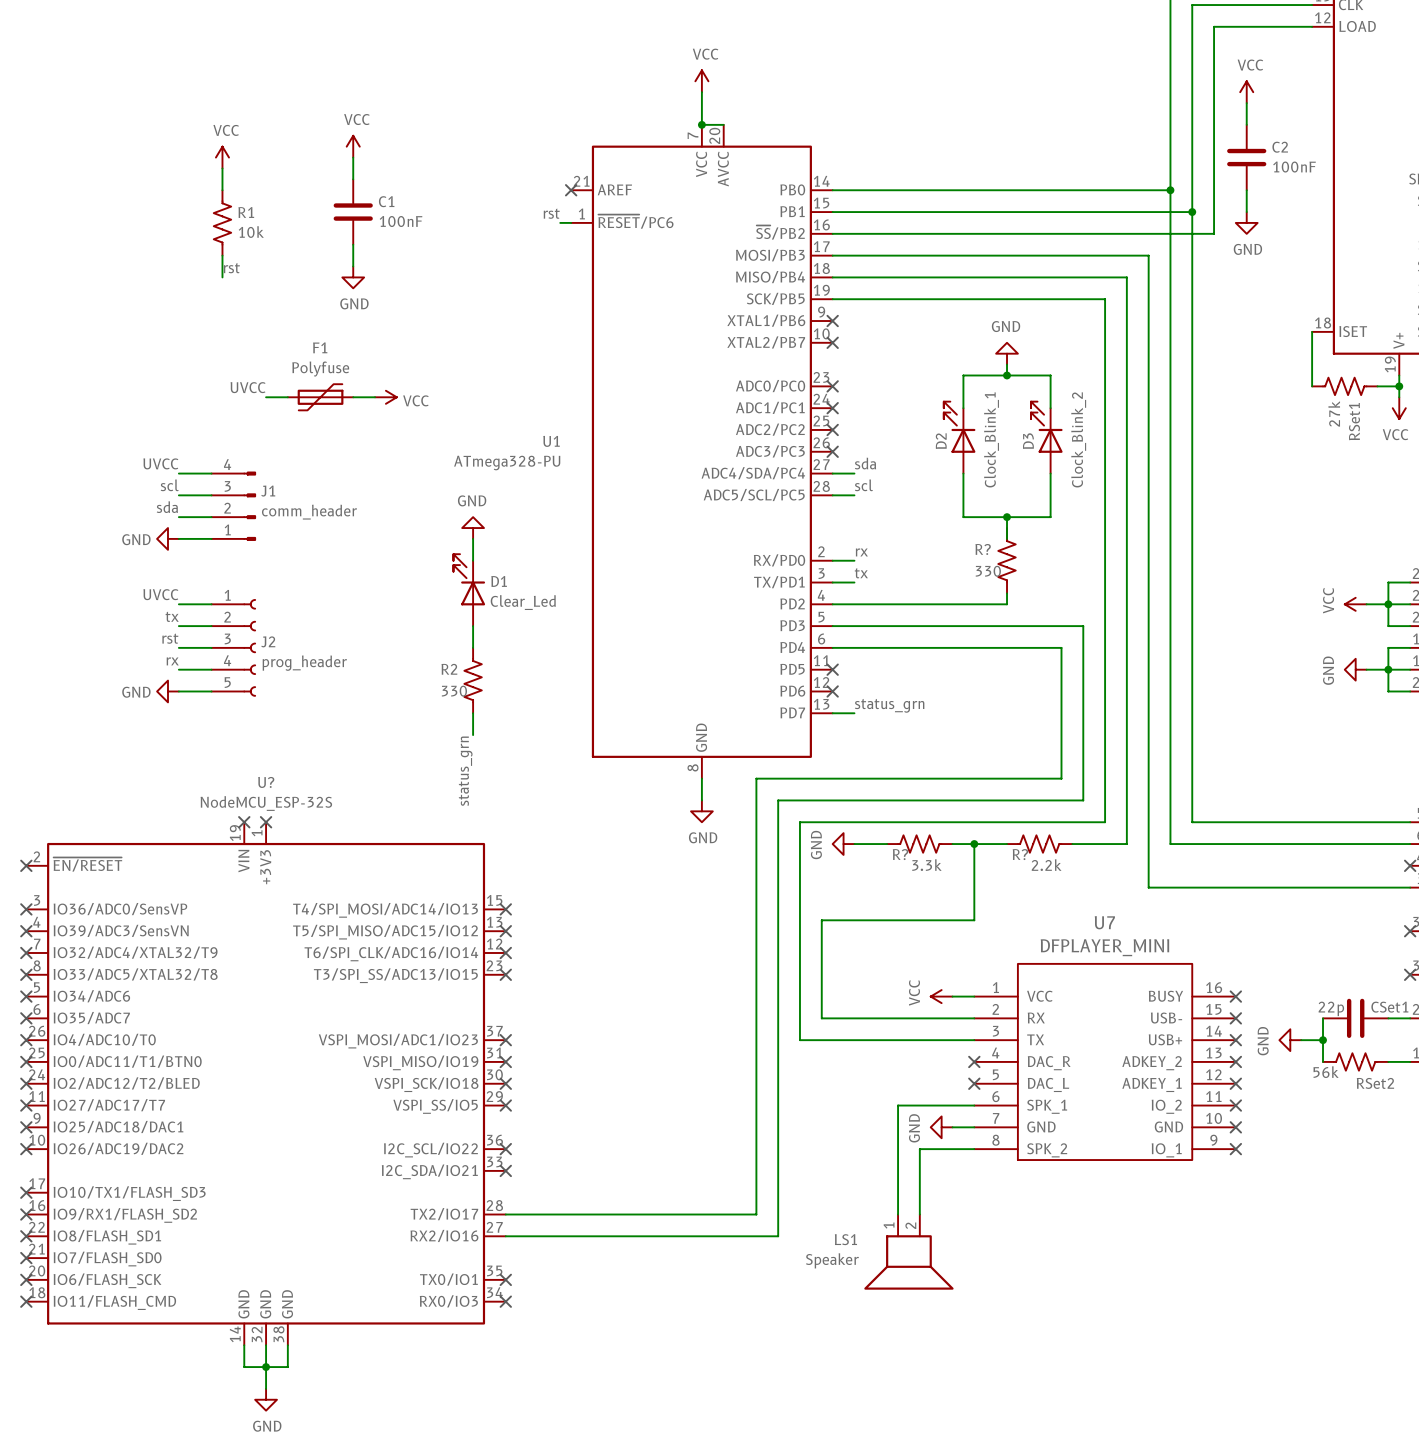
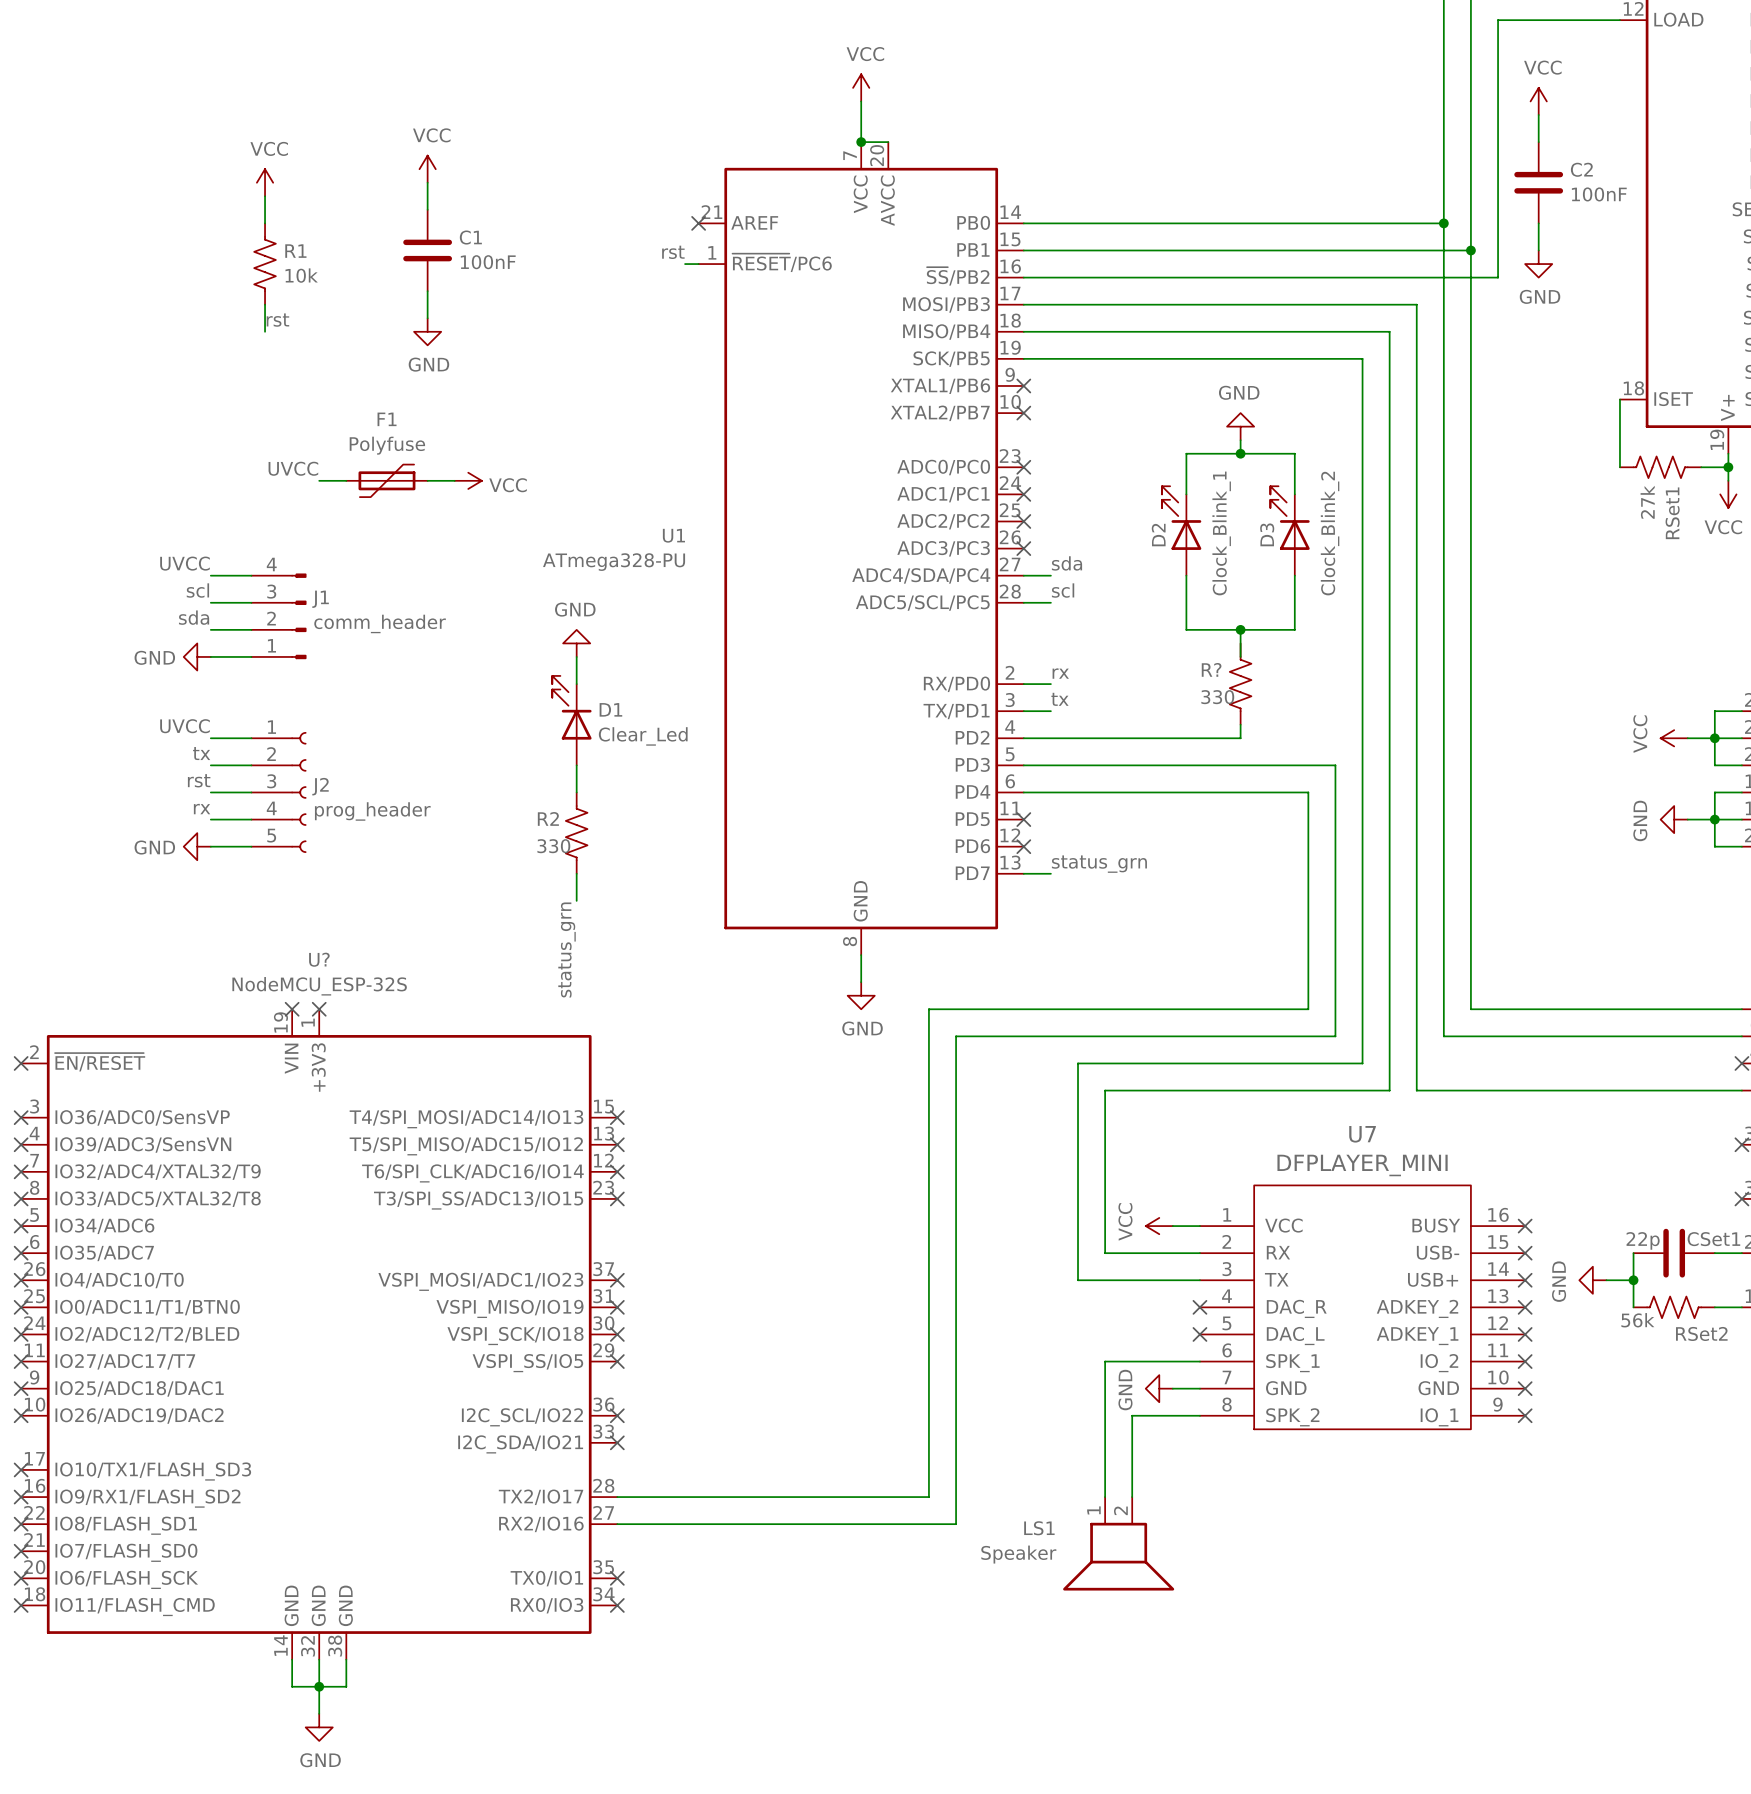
wire: (1061, 778) (756, 778) (756, 822) -> none
wire: (1083, 800) (778, 800) (778, 844) -> (1050, 1036) (956, 1036)
wire: (799, 822) (799, 1040) (876, 1040) -> (983, 1009) (928, 1009)
wire: (1061, 822) (1105, 822) -> (1308, 1009) (1308, 955)
wire: none -> (1362, 1009) (1362, 1063) (1078, 1063) (1078, 1280)
power symbol: GND (843, 844) -> none
R?: 3.3k (919, 844) -> none
wire: (974, 844) (974, 920) (821, 920) (821, 1018) (898, 1018) -> (1389, 1036) (1389, 1090) (1105, 1090) (1105, 1253)
junction: (974, 844) -> none
R?: 2.2k (1039, 844) -> none
wire: (1083, 844) (1126, 844) -> (1335, 1036) (1335, 982)

